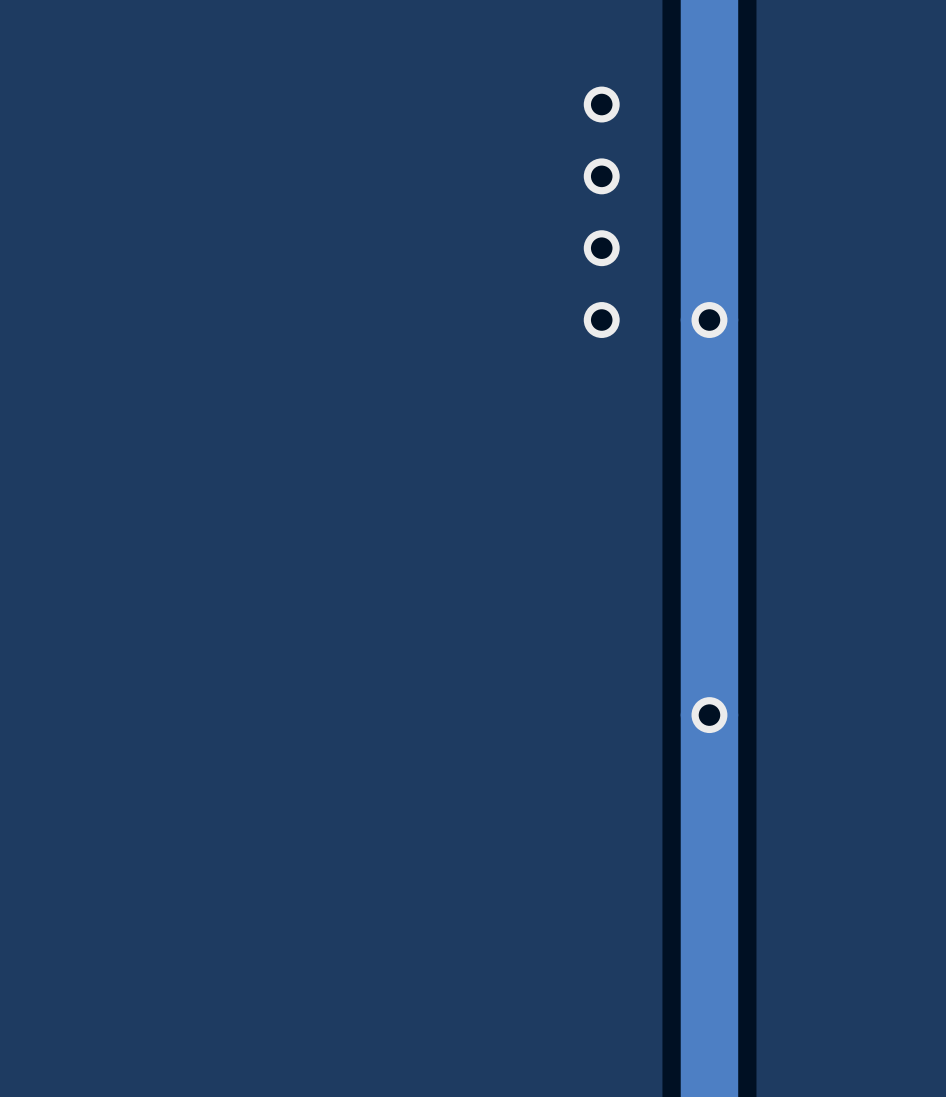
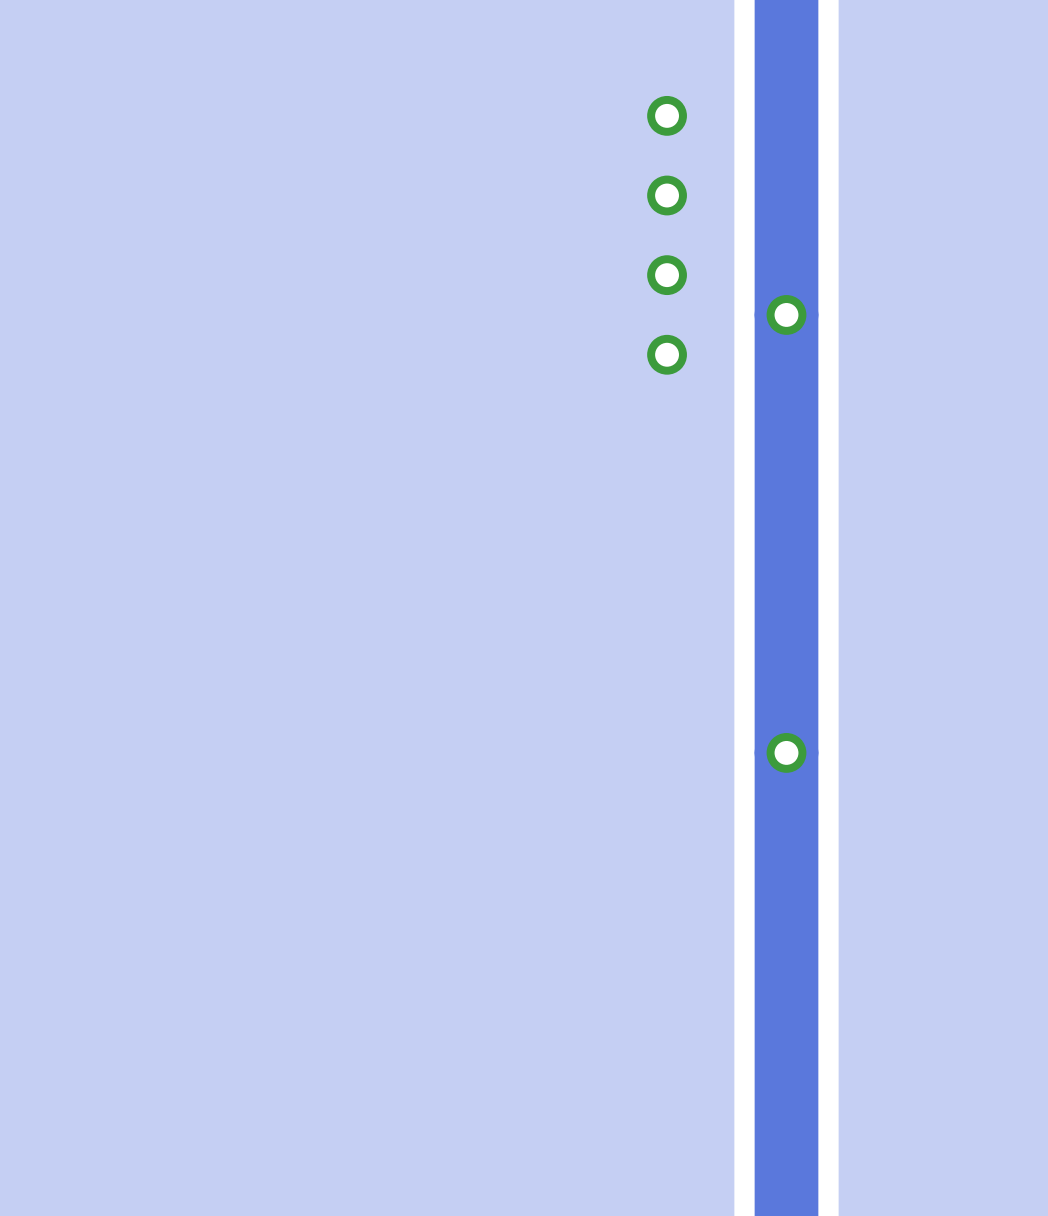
via position: (709, 320) -> (786, 314)
via position: (709, 715) -> (786, 752)

